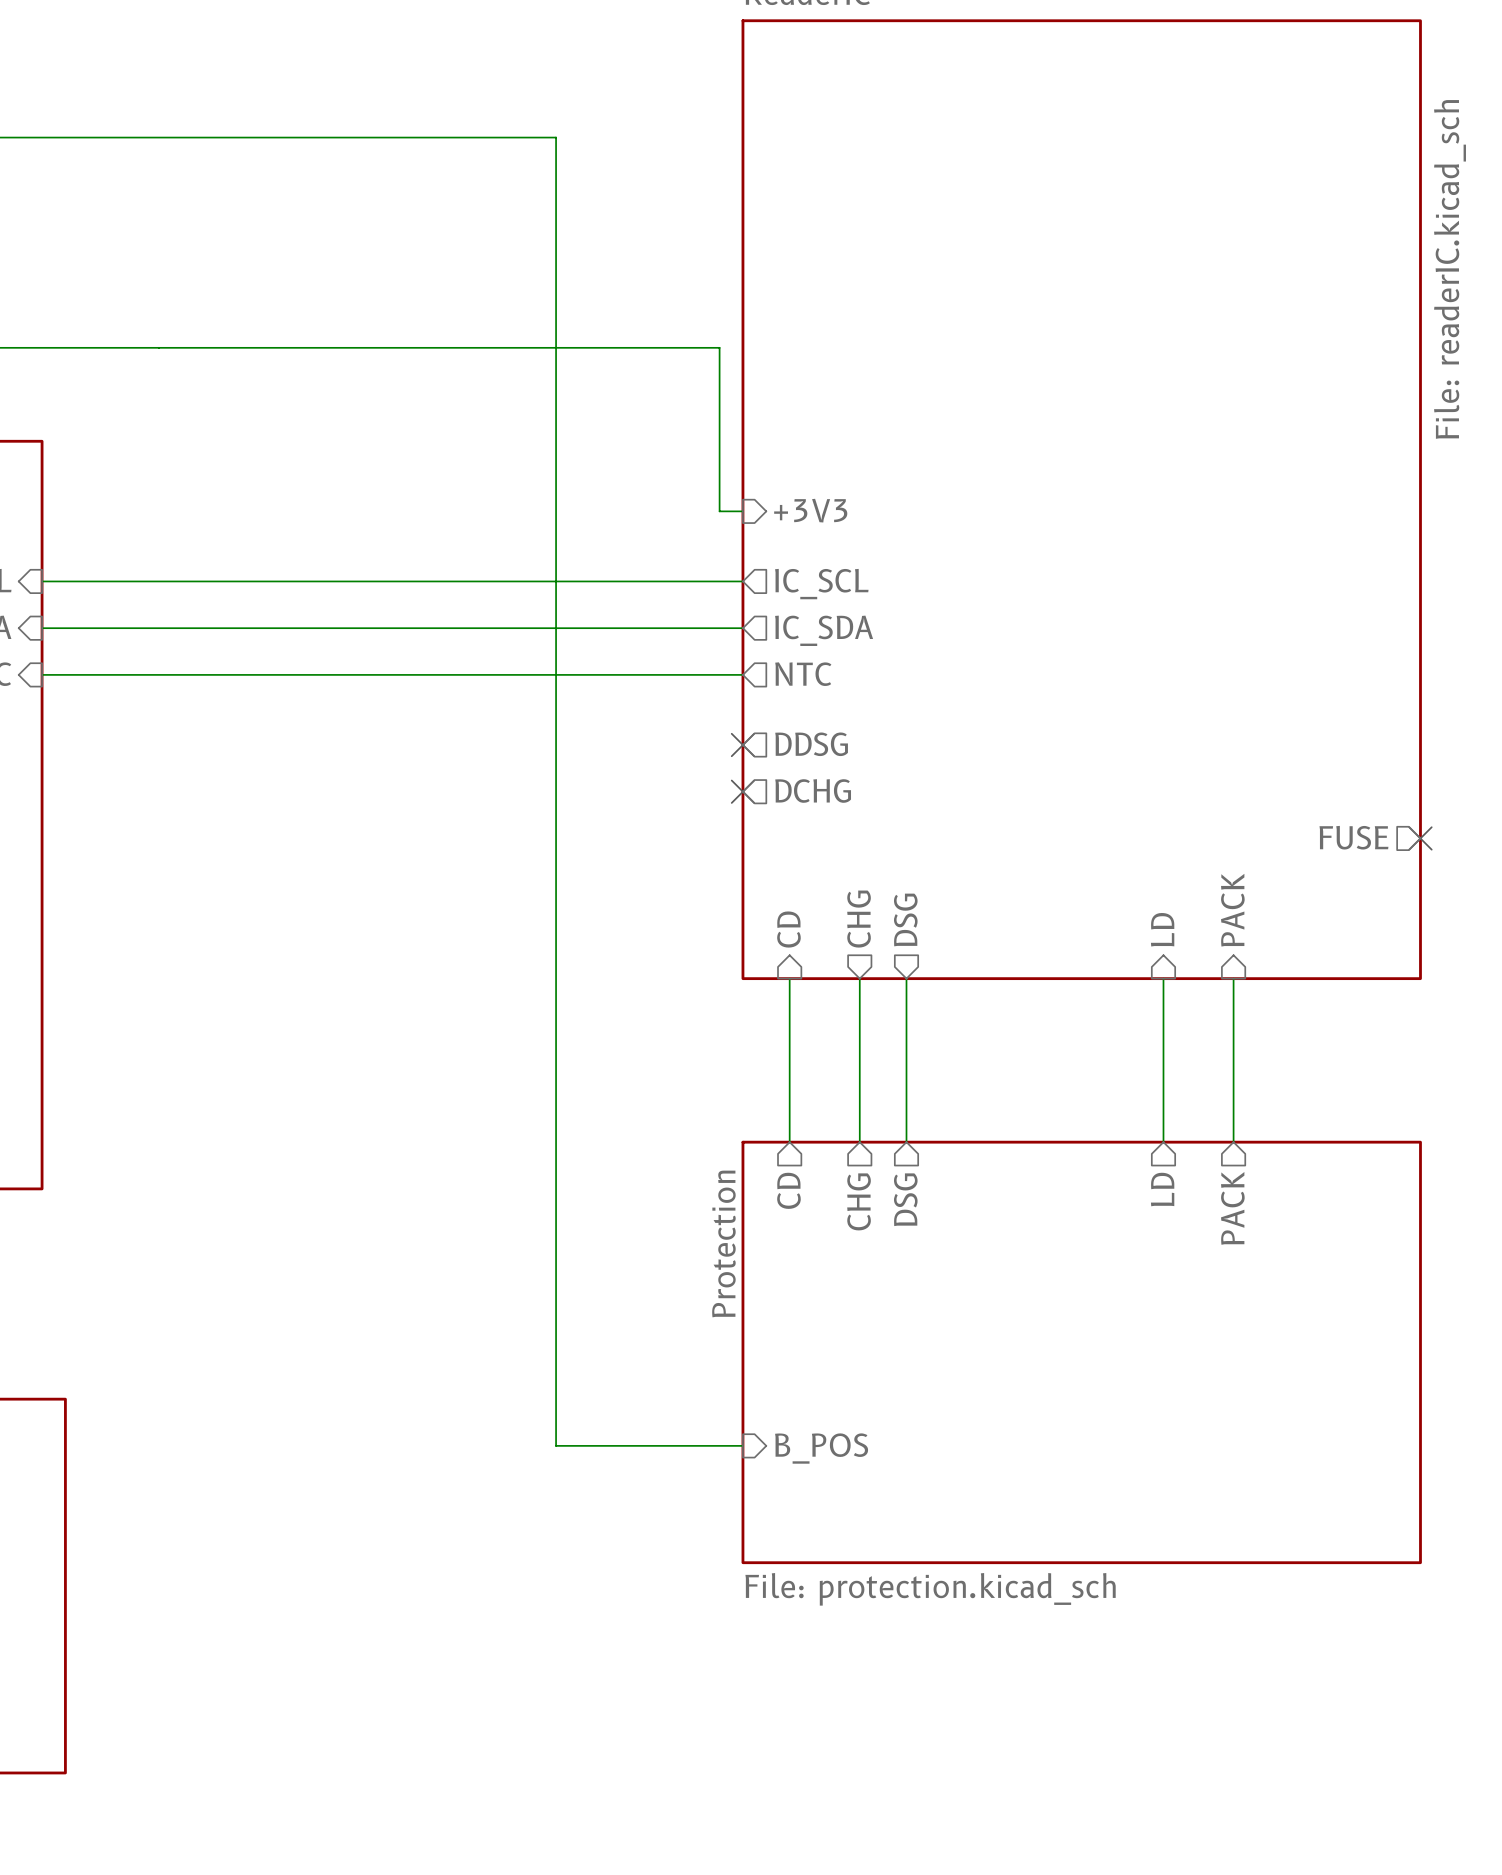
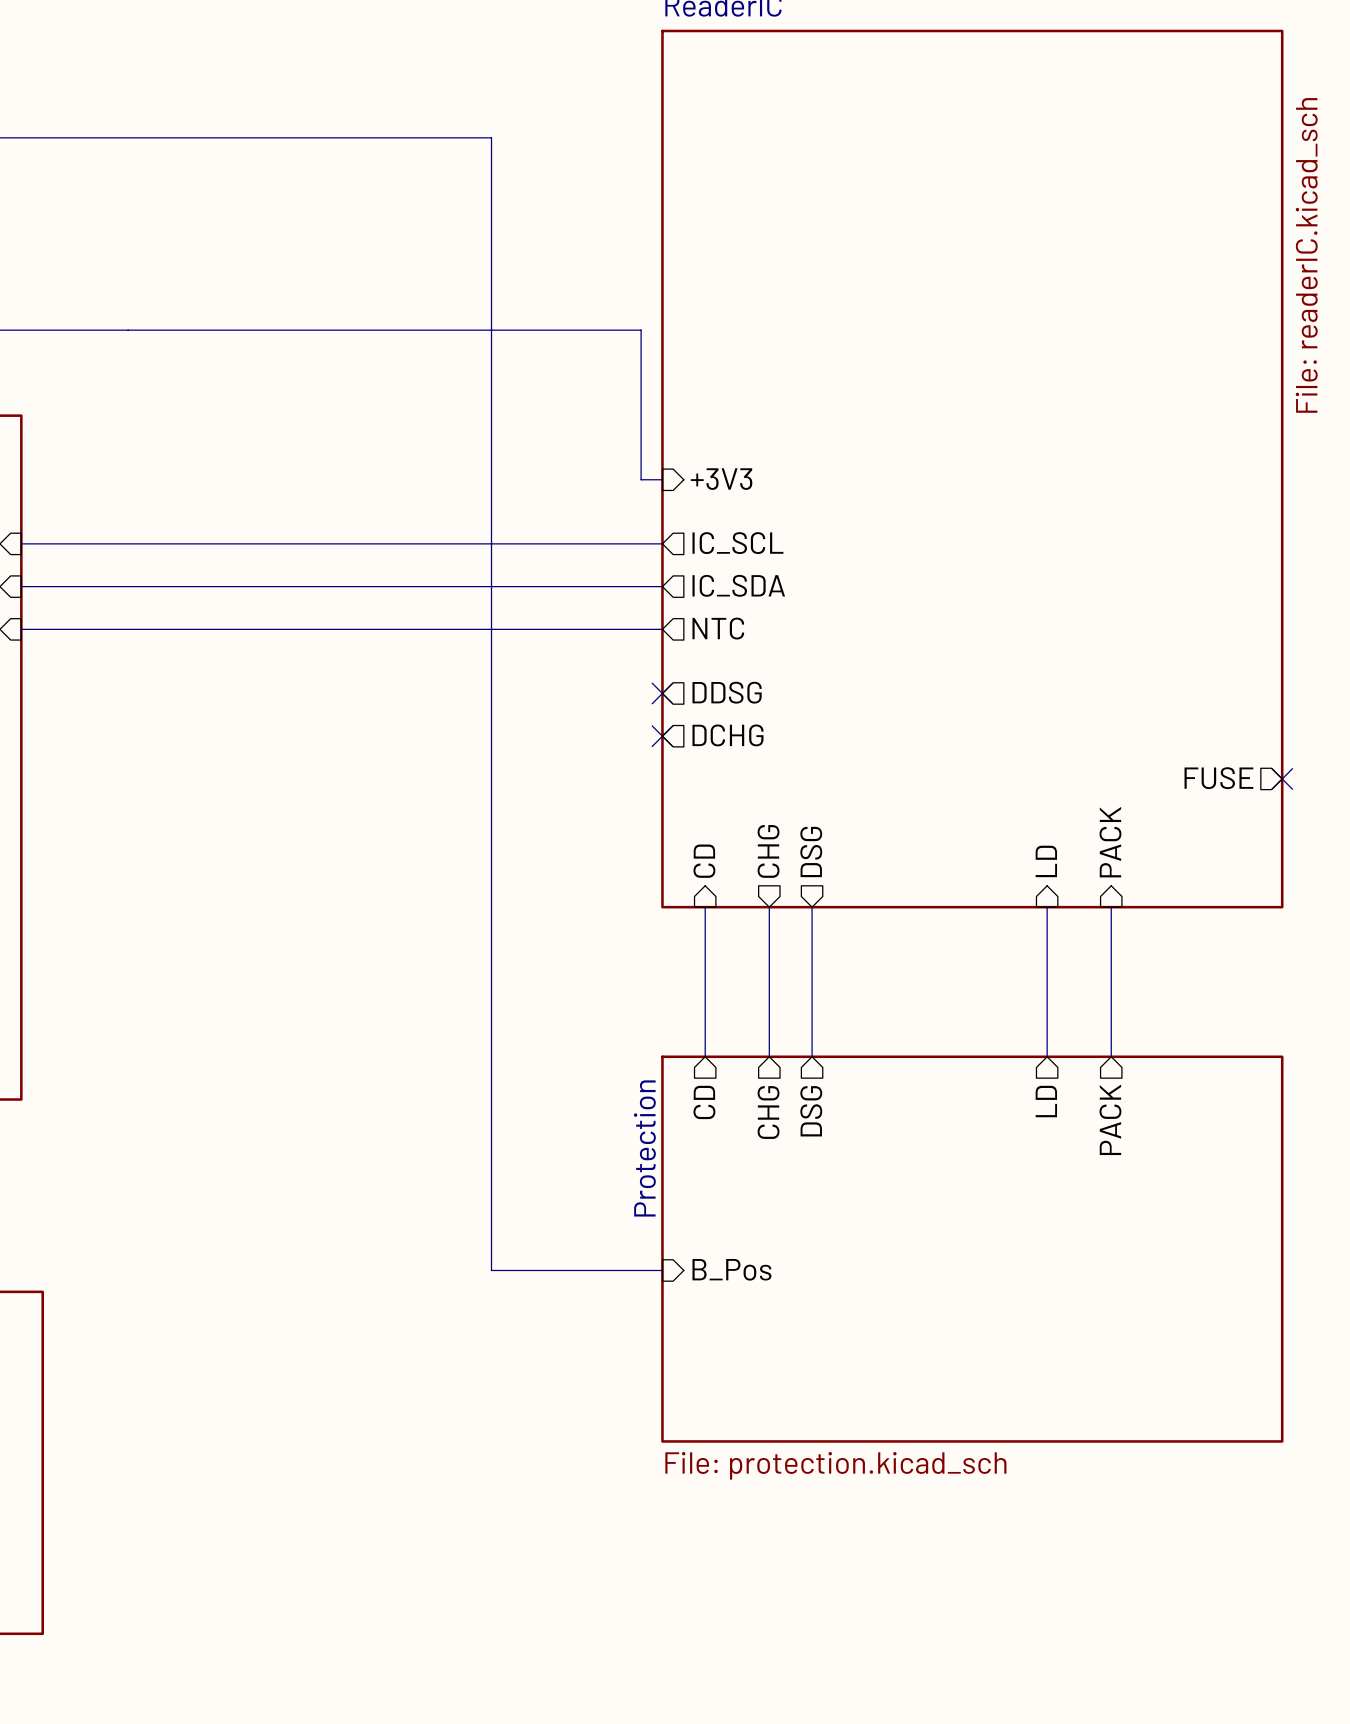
wire: (556, 1375) (556, 1445) (742, 1445) -> (491, 1270) (662, 1270)
sheet pin: none -> B_Pos (731, 1269)
sheet pin: B_POS (821, 1448) -> none

